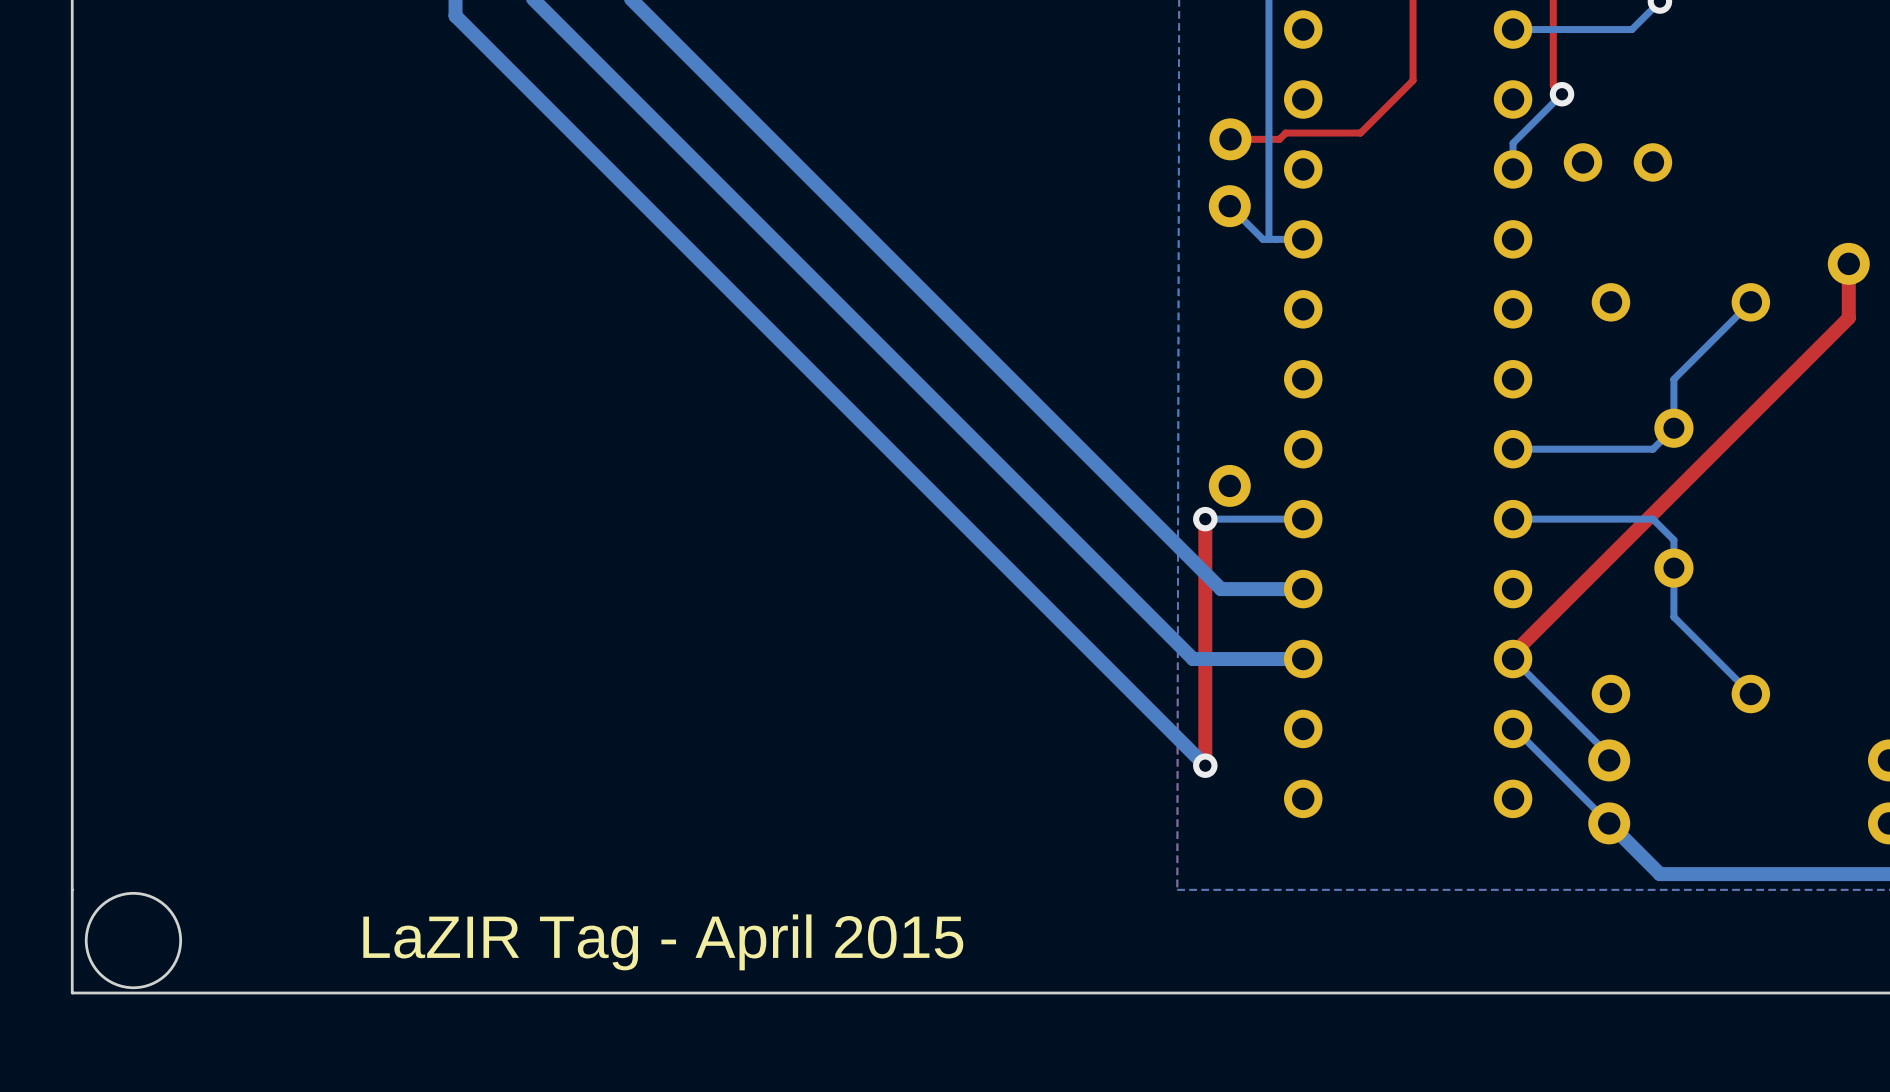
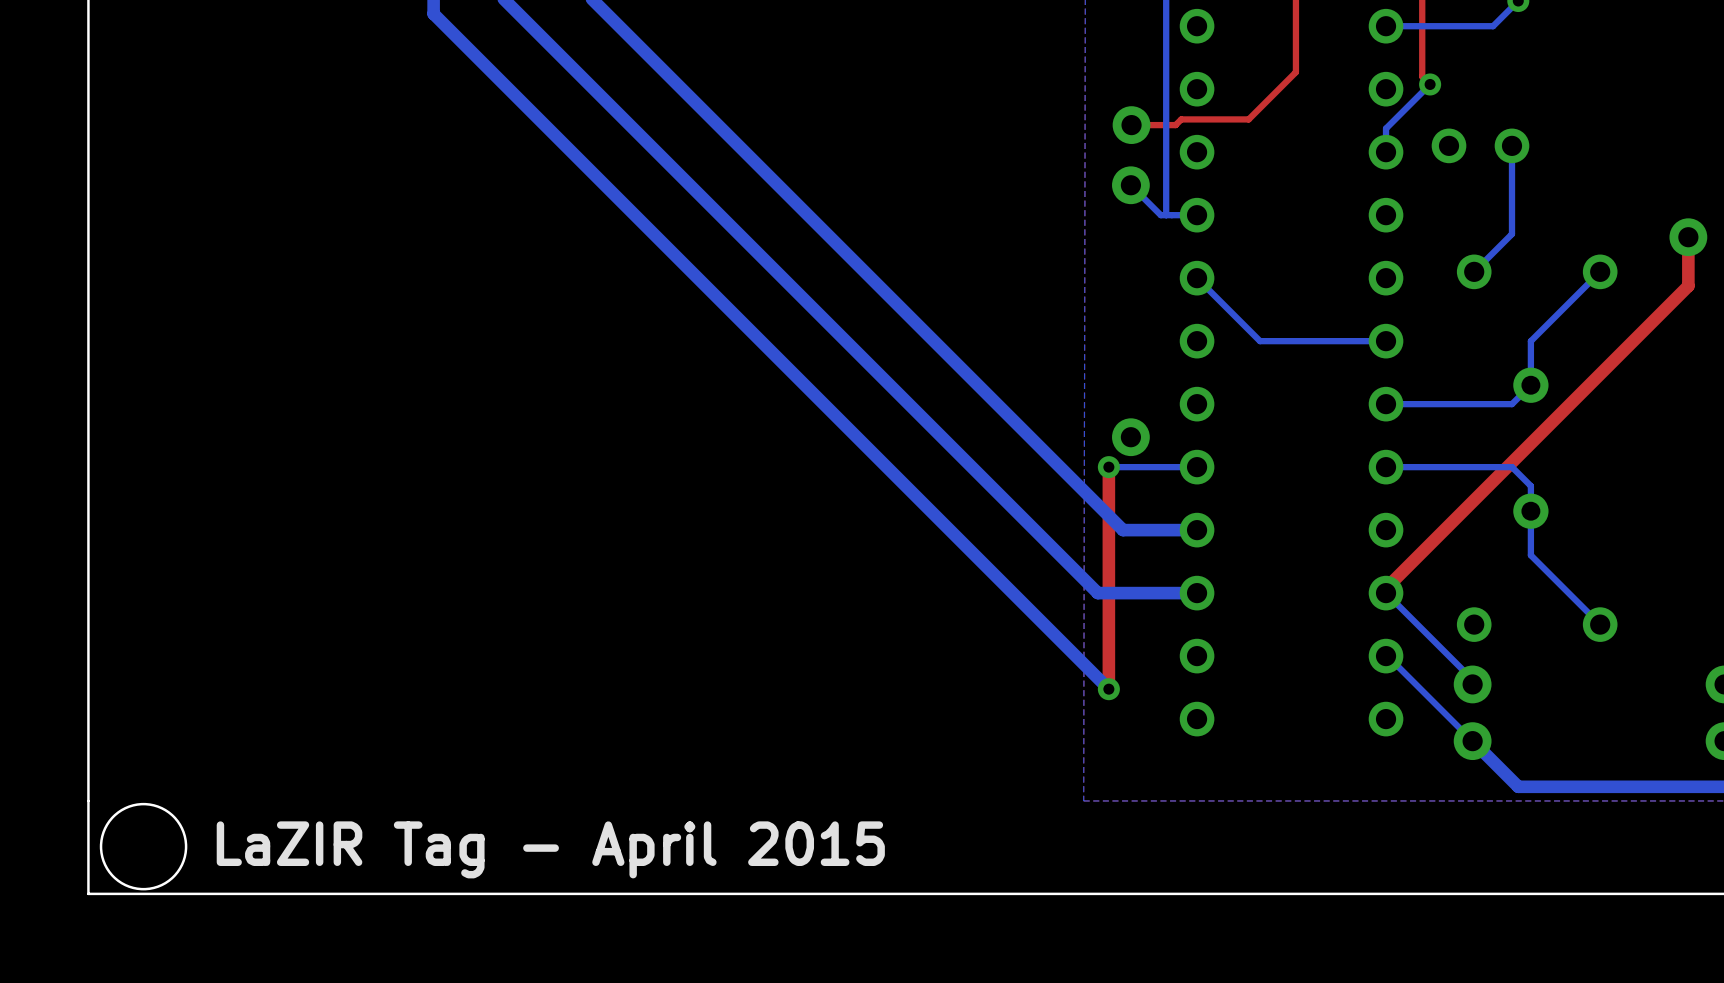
bottom track: none -> (1512, 145) (1512, 234) (1474, 271)
bottom track: none -> (1197, 278) (1260, 341) (1386, 341)

